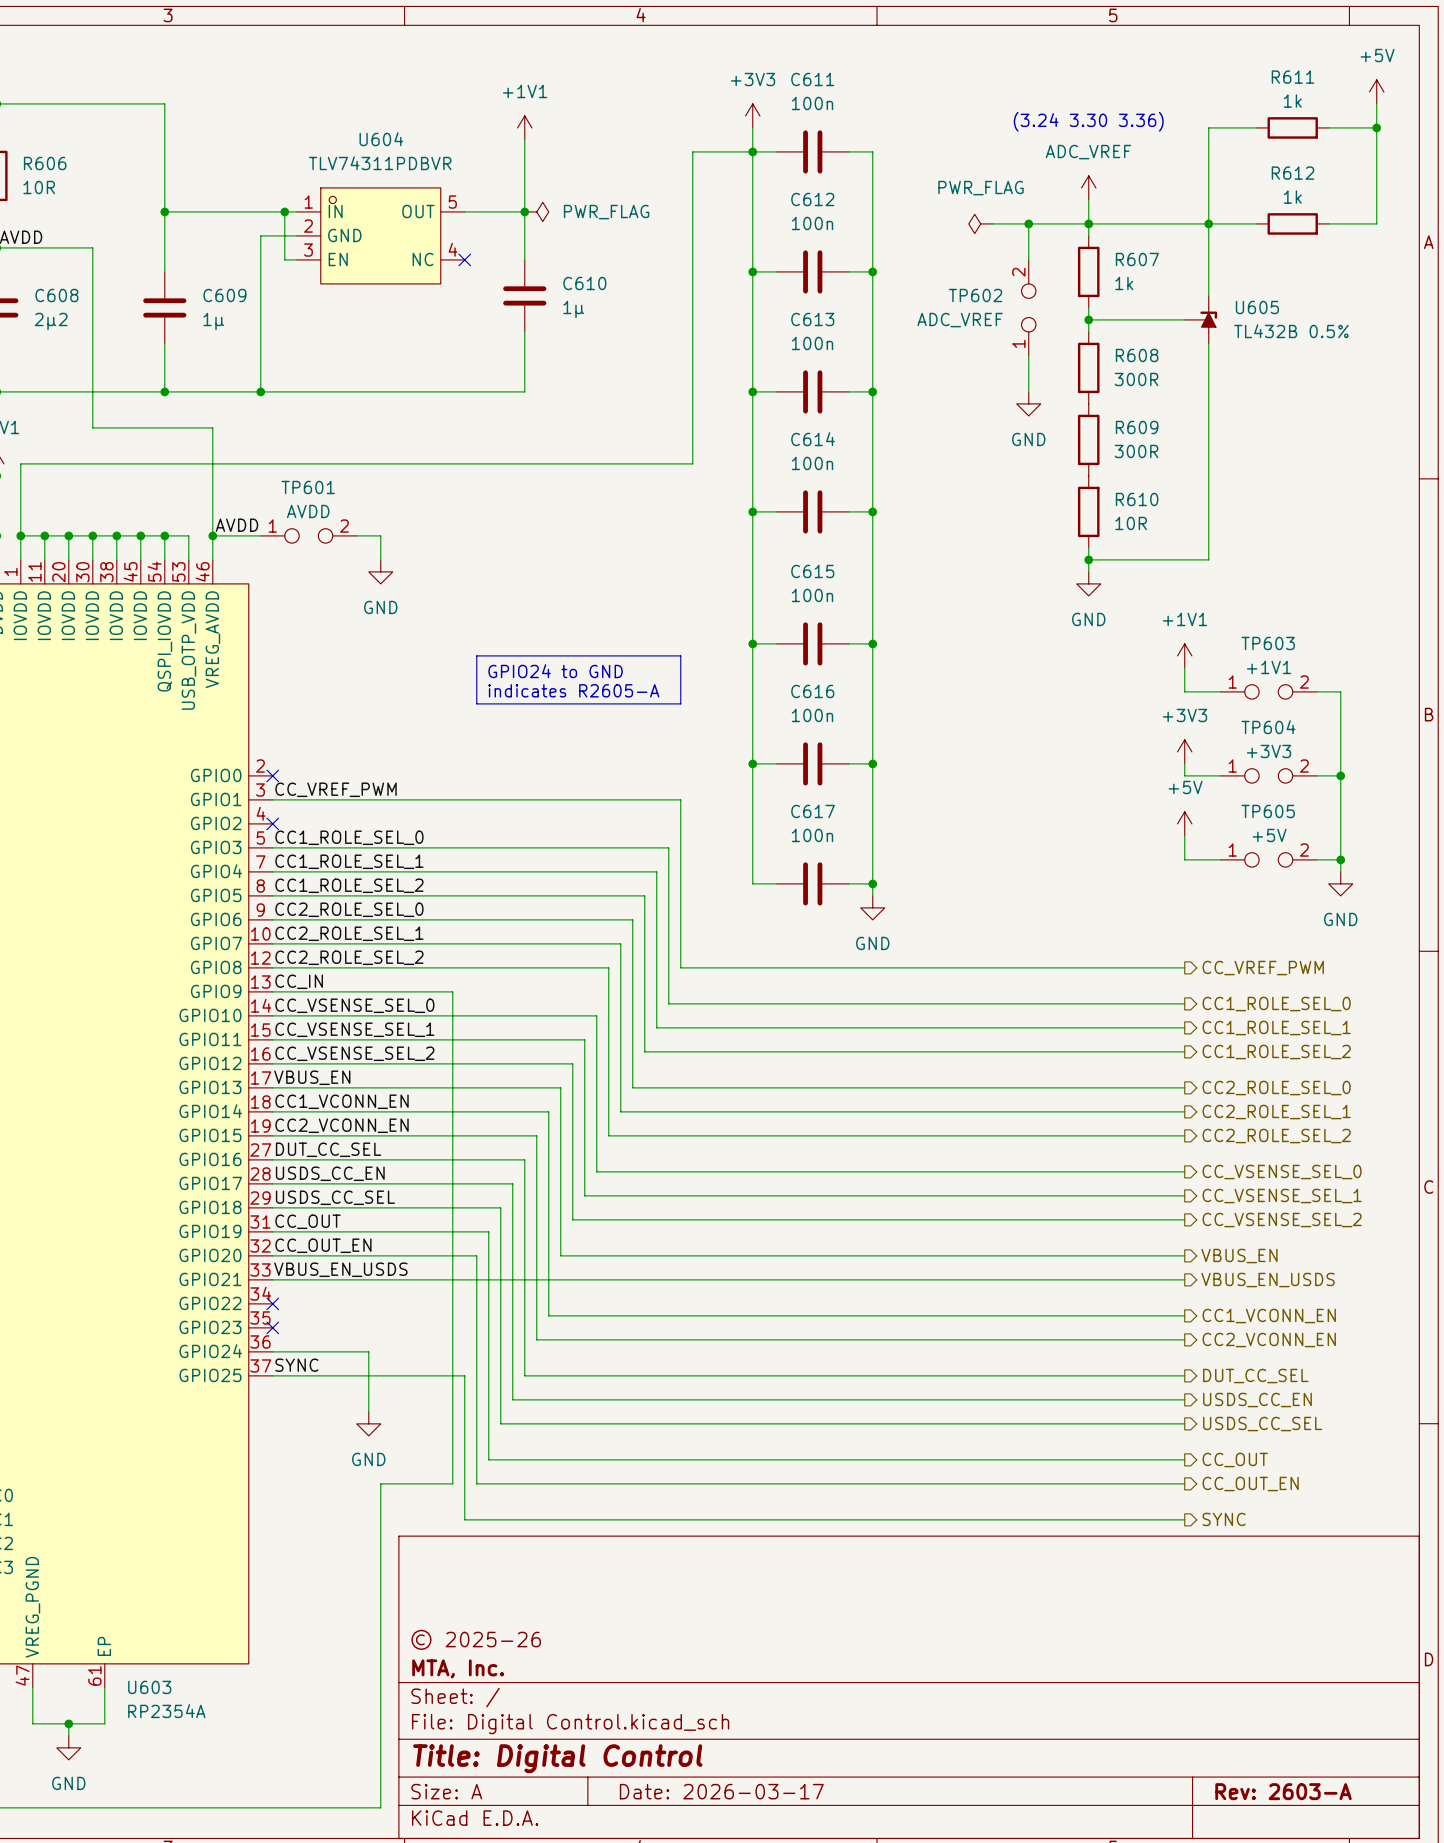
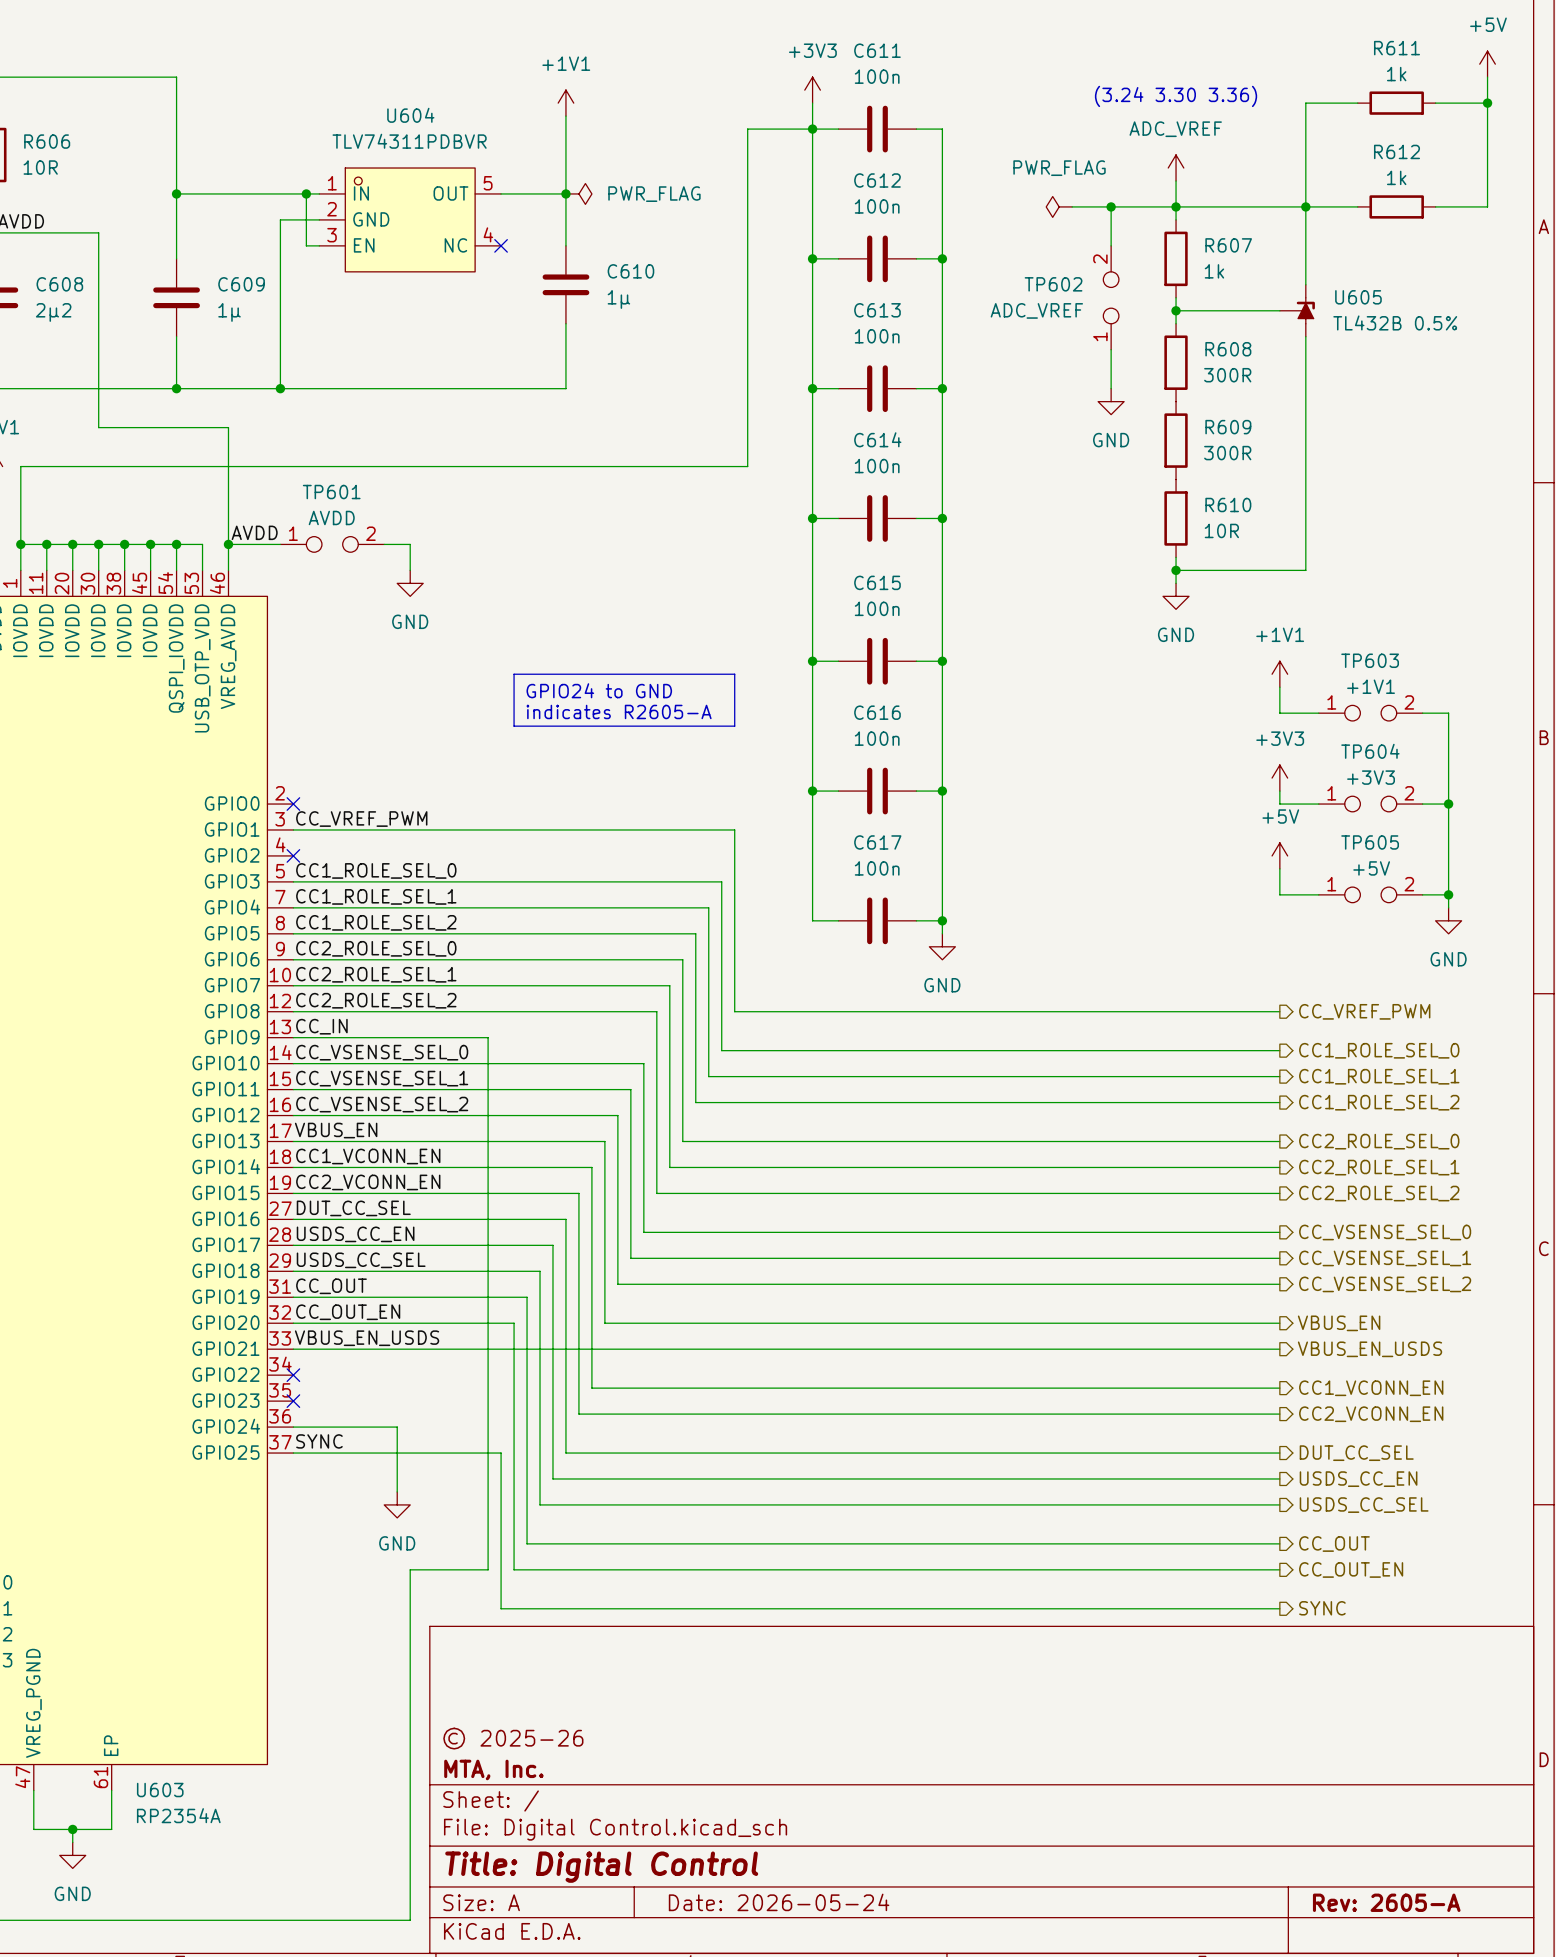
title block: Date: 2026-03-17 (721, 1791) -> Date: 2026-05-24 (779, 1902)
title block: Rev: 2603-A (1283, 1791) -> Rev: 2605-A (1386, 1902)

